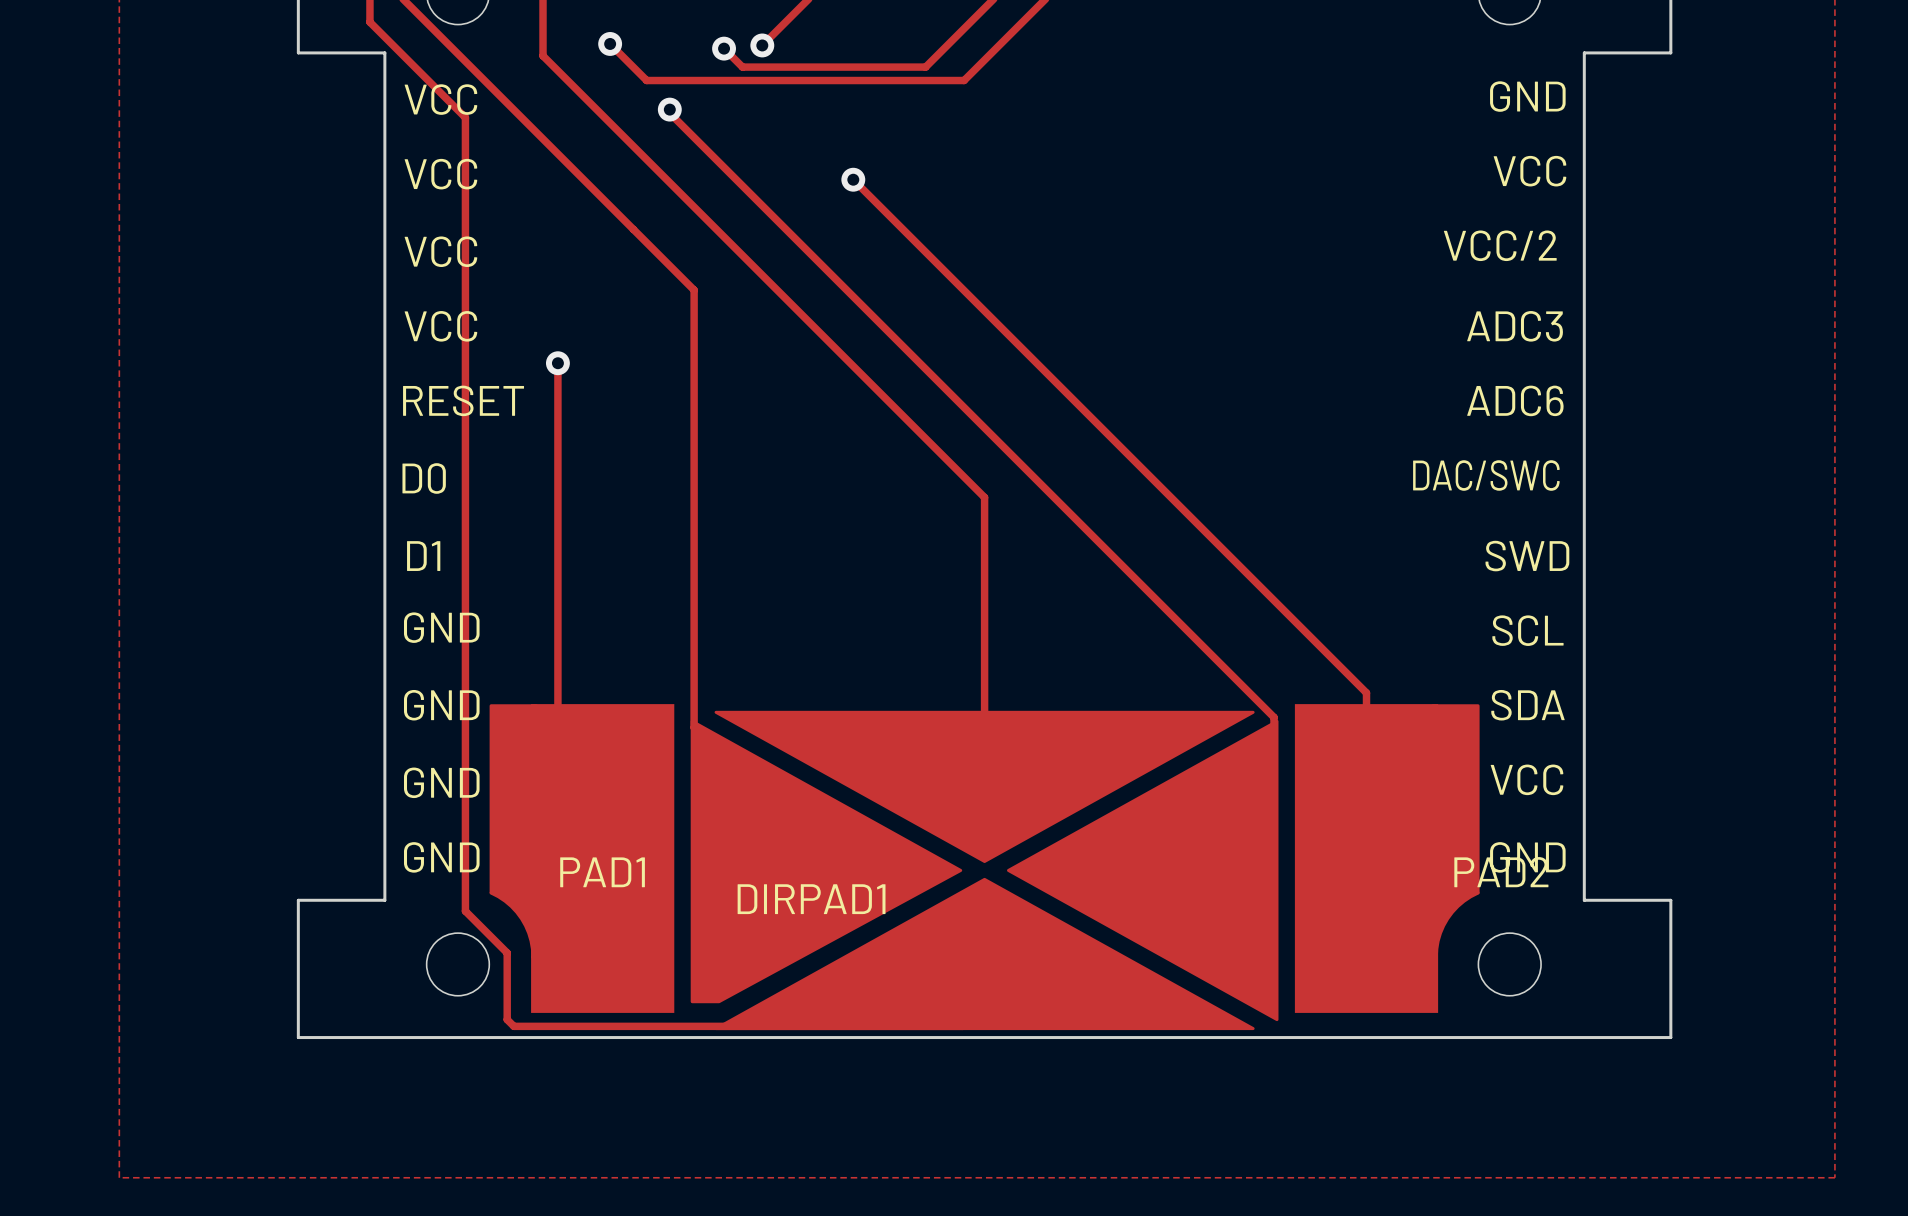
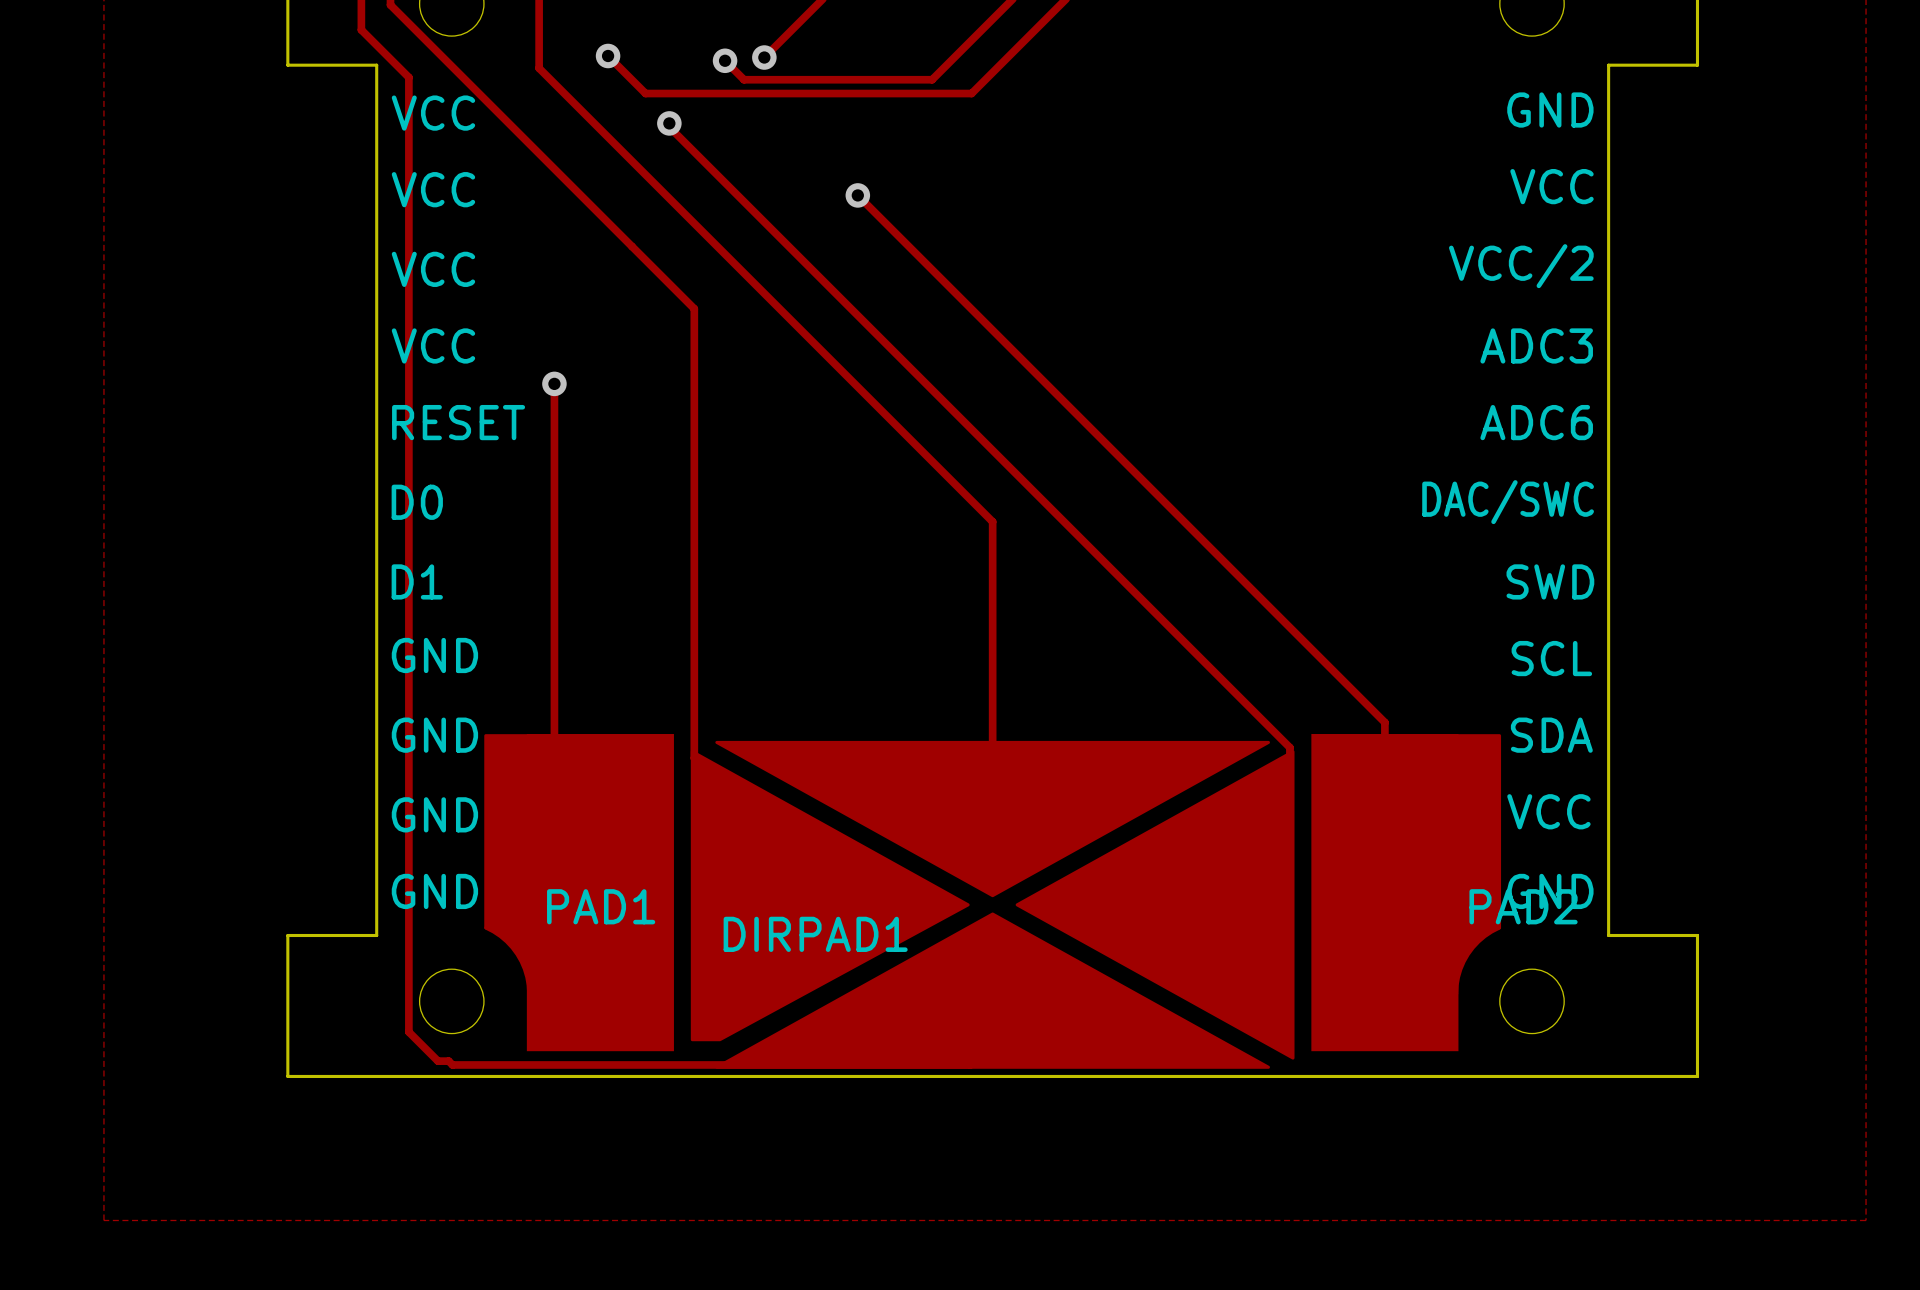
track: (369, 18) (369, 22) (465, 117) (465, 911) (507, 952) (507, 1019) (513, 1026) -> (361, 29) (408, 77) (408, 1032) (437, 1061) (448, 1061) (452, 1064) (509, 1064)

